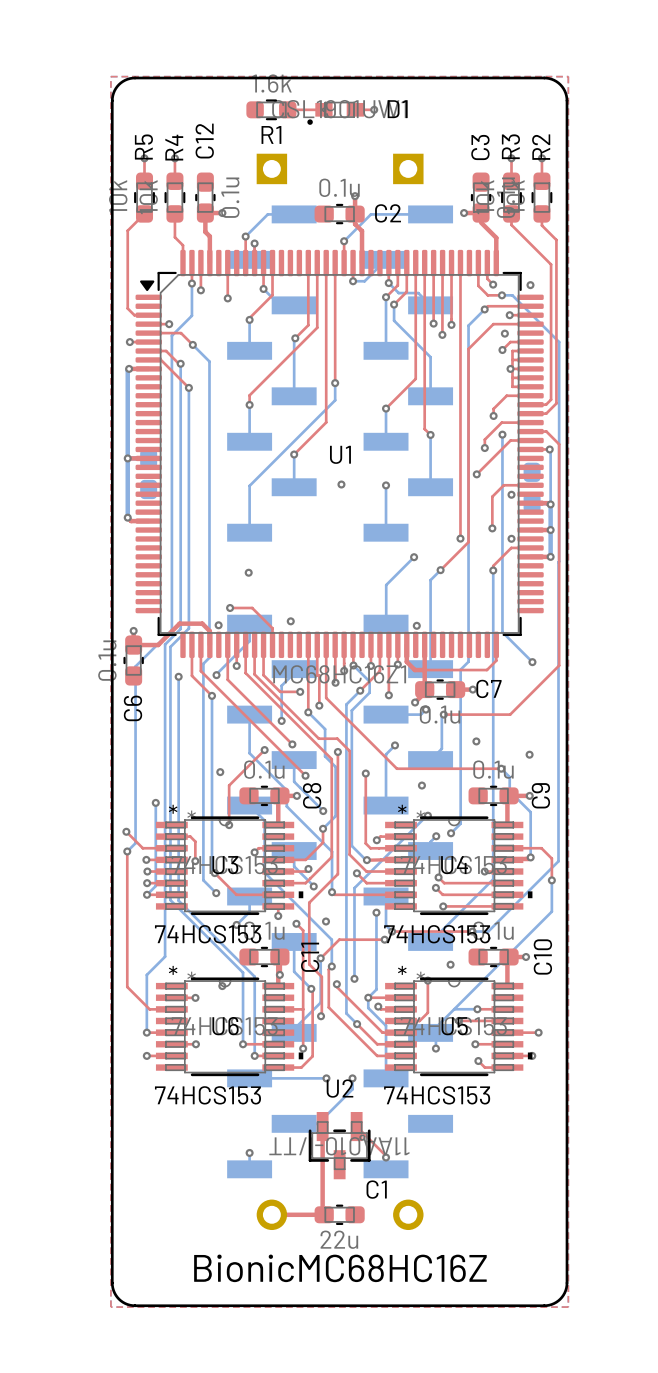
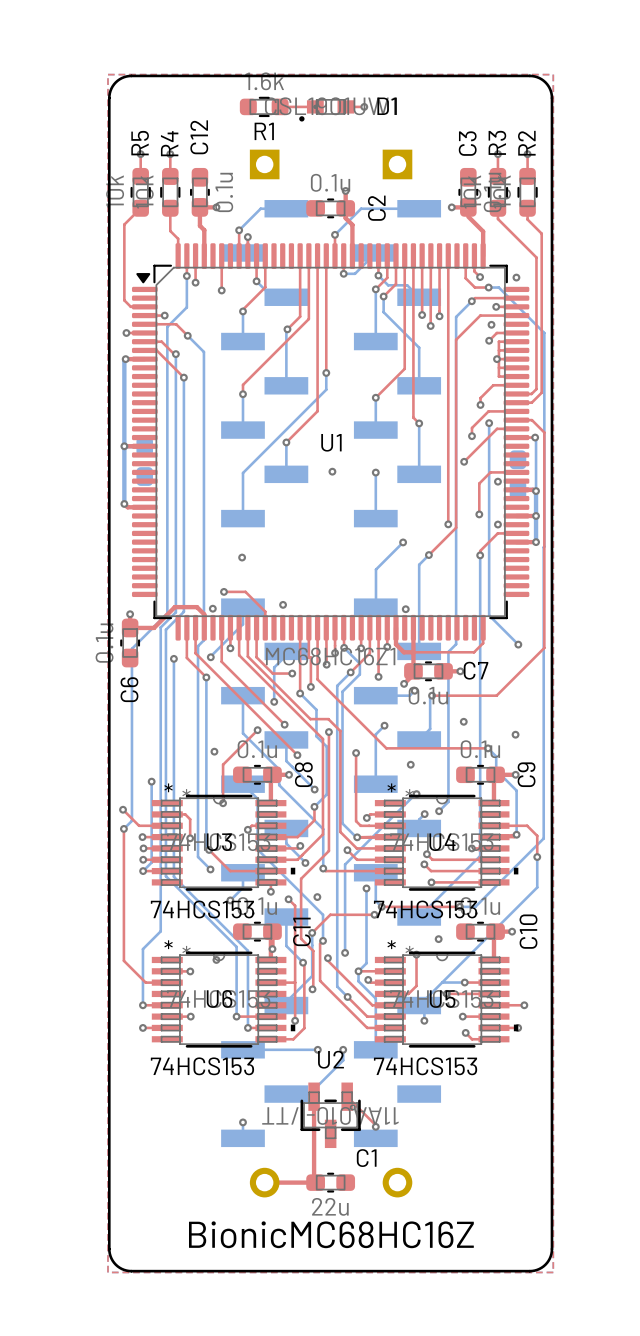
C2 name rotation: 0° (388, 213) -> 90° counterclockwise (376, 208)

